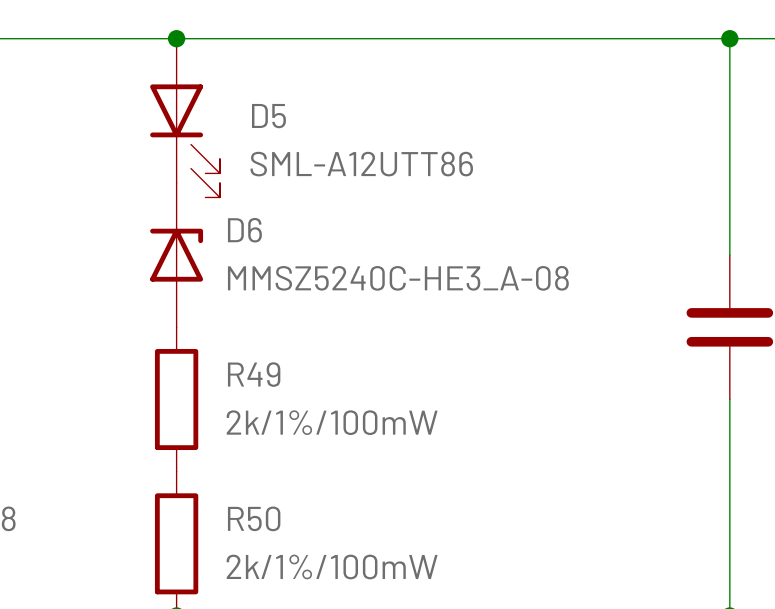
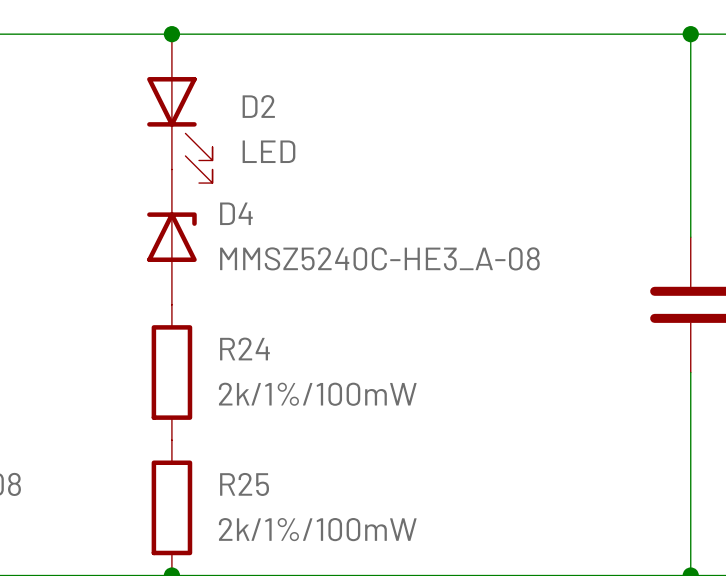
D5 name: D5 (268, 116) -> D2 (258, 106)
D5 value: SML-A12UTT86 (361, 164) -> LED (268, 151)
D6 name: D6 (244, 230) -> D4 (236, 213)
R49 name: R49 (254, 374) -> R24 (244, 348)
R50 name: R50 (254, 518) -> R25 (244, 484)

